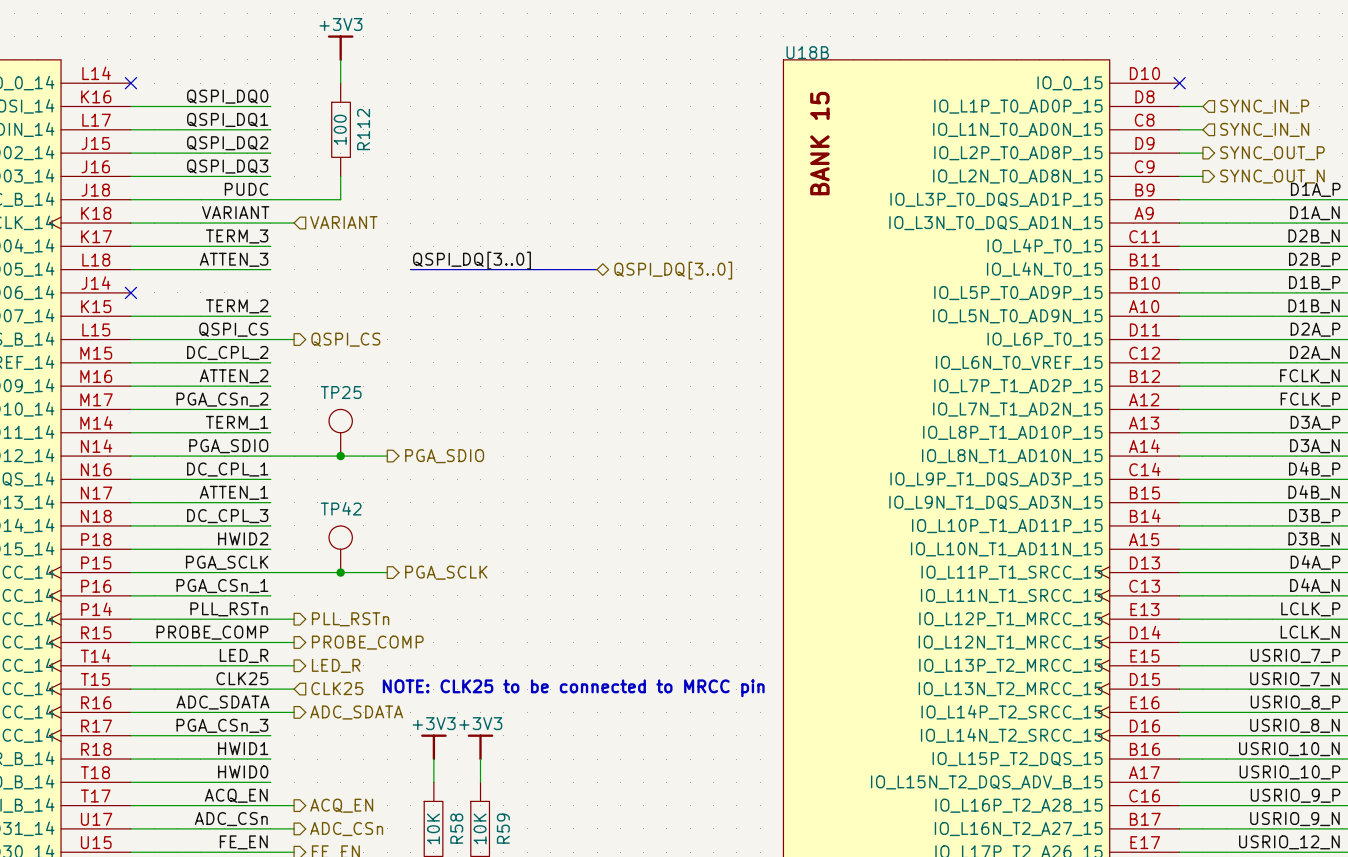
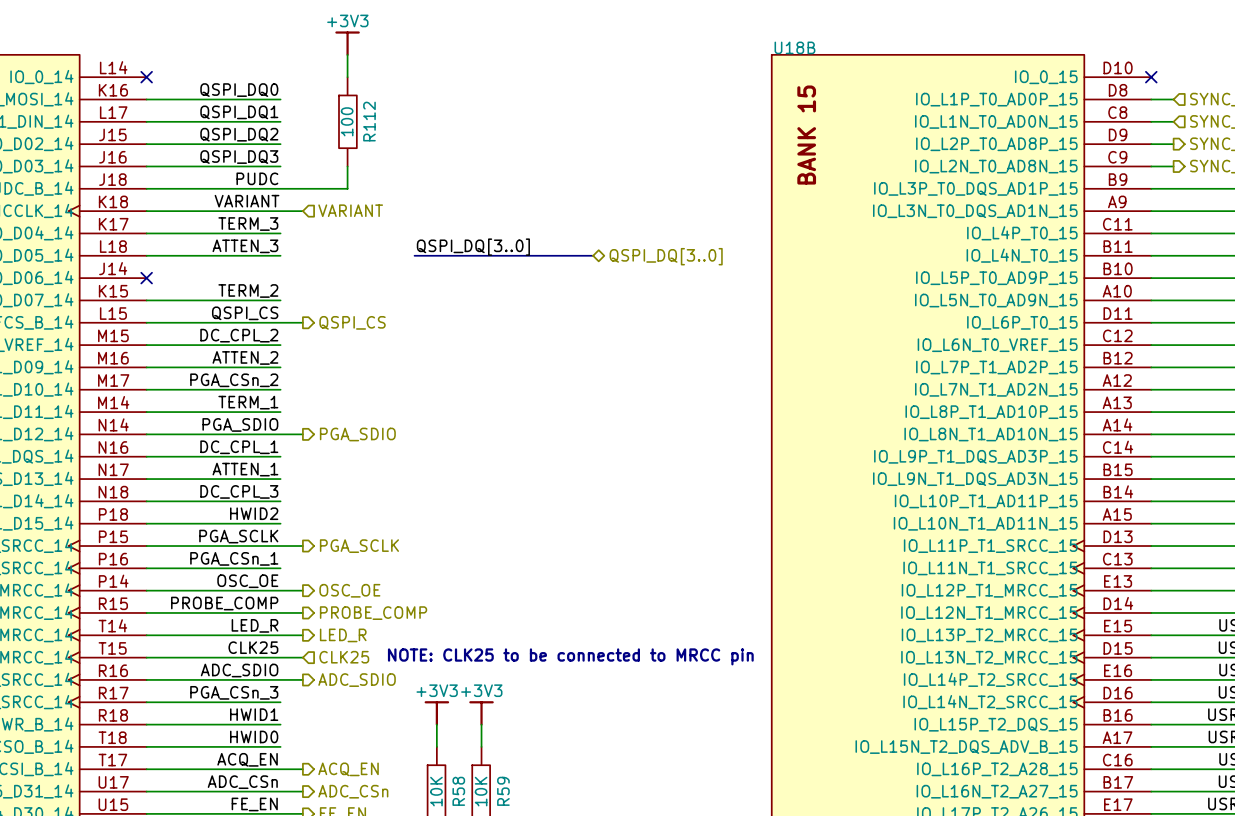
TP25: (340, 432) -> none
wire: (294, 456) (387, 456) -> none
junction: (340, 456) -> none
hierarchical label position: PGA_SDIO (444, 456) -> PGA_SDIO (357, 434)
TP42: (340, 549) -> none
wire: (294, 572) (387, 572) -> none
junction: (340, 572) -> none
hierarchical label position: PGA_SCLK (446, 572) -> PGA_SCLK (359, 546)
label: PLL_RSTn (229, 609) -> OSC_OE (247, 581)
hierarchical label: PLL_RSTn (350, 619) -> OSC_OE (349, 590)
label: ADC_SDATA (222, 702) -> ADC_SDIO (239, 670)
hierarchical label: ADC_SDATA (356, 712) -> ADC_SDIO (357, 680)

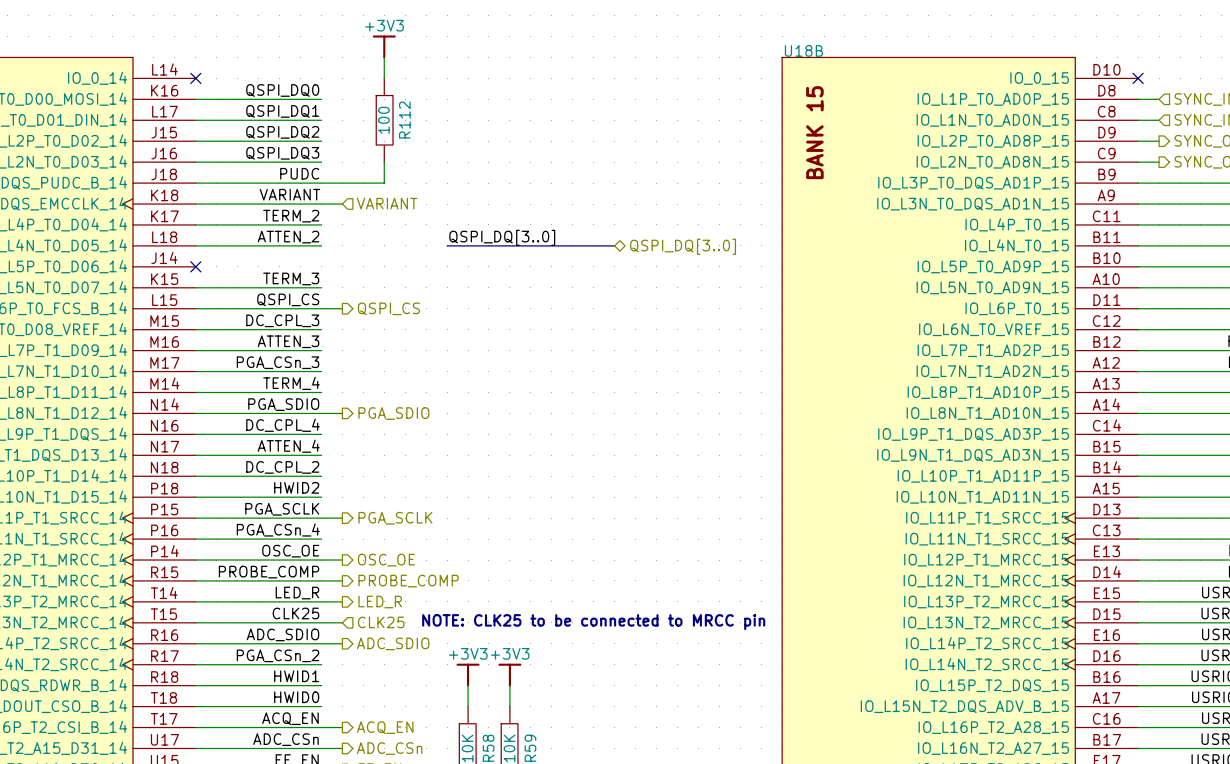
label: TERM_3 (248, 224) -> TERM_2 (291, 216)
label: ATTEN_3 (245, 246) -> ATTEN_2 (288, 237)
label: TERM_2 (248, 291) -> TERM_3 (291, 278)
label: DC_CPL_2 (239, 335) -> DC_CPL_3 (282, 320)
label: ATTEN_2 (245, 357) -> ATTEN_3 (288, 341)
label: PGA_CSn_2 (234, 380) -> PGA_CSn_3 (278, 362)
label: TERM_1 (248, 402) -> TERM_4 (291, 383)
label: DC_CPL_1 (239, 447) -> DC_CPL_4 (282, 425)
label: ATTEN_1 (245, 469) -> ATTEN_4 (288, 446)
label: DC_CPL_3 (239, 491) -> DC_CPL_2 (282, 467)
label: PGA_CSn_1 (234, 558) -> PGA_CSn_4 (278, 529)
label: PGA_CSn_3 (234, 692) -> PGA_CSn_2 (278, 655)

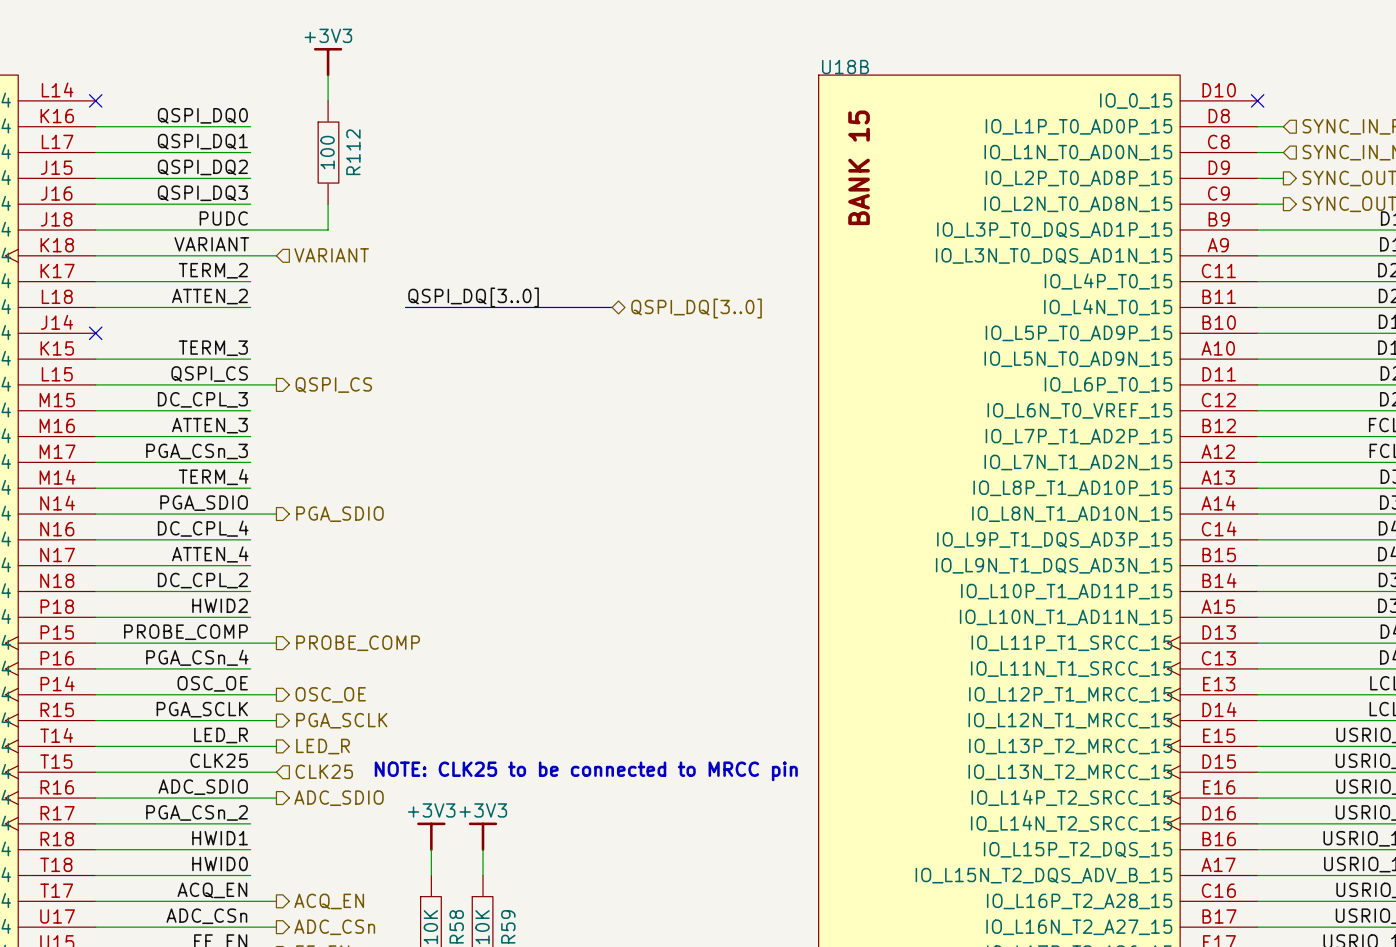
label: PGA_SCLK (282, 509) -> PROBE_COMP (185, 632)
hierarchical label: PGA_SCLK (395, 518) -> PROBE_COMP (358, 643)
label: PROBE_COMP (269, 572) -> PGA_SCLK (202, 709)
hierarchical label: PROBE_COMP (408, 581) -> PGA_SCLK (341, 720)

